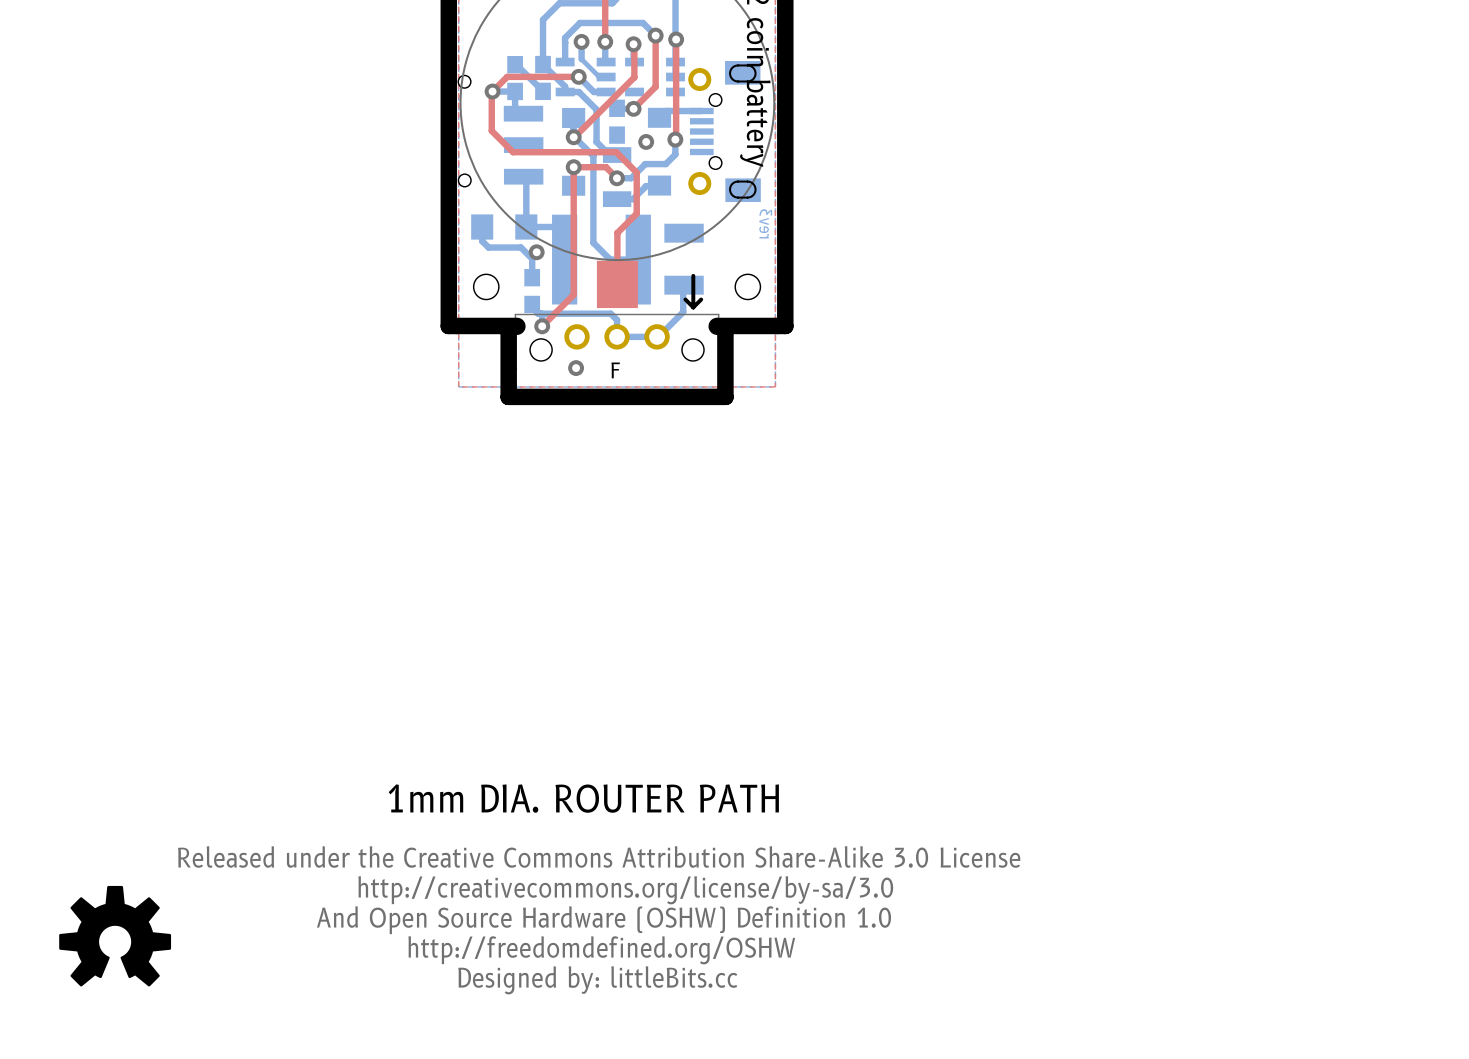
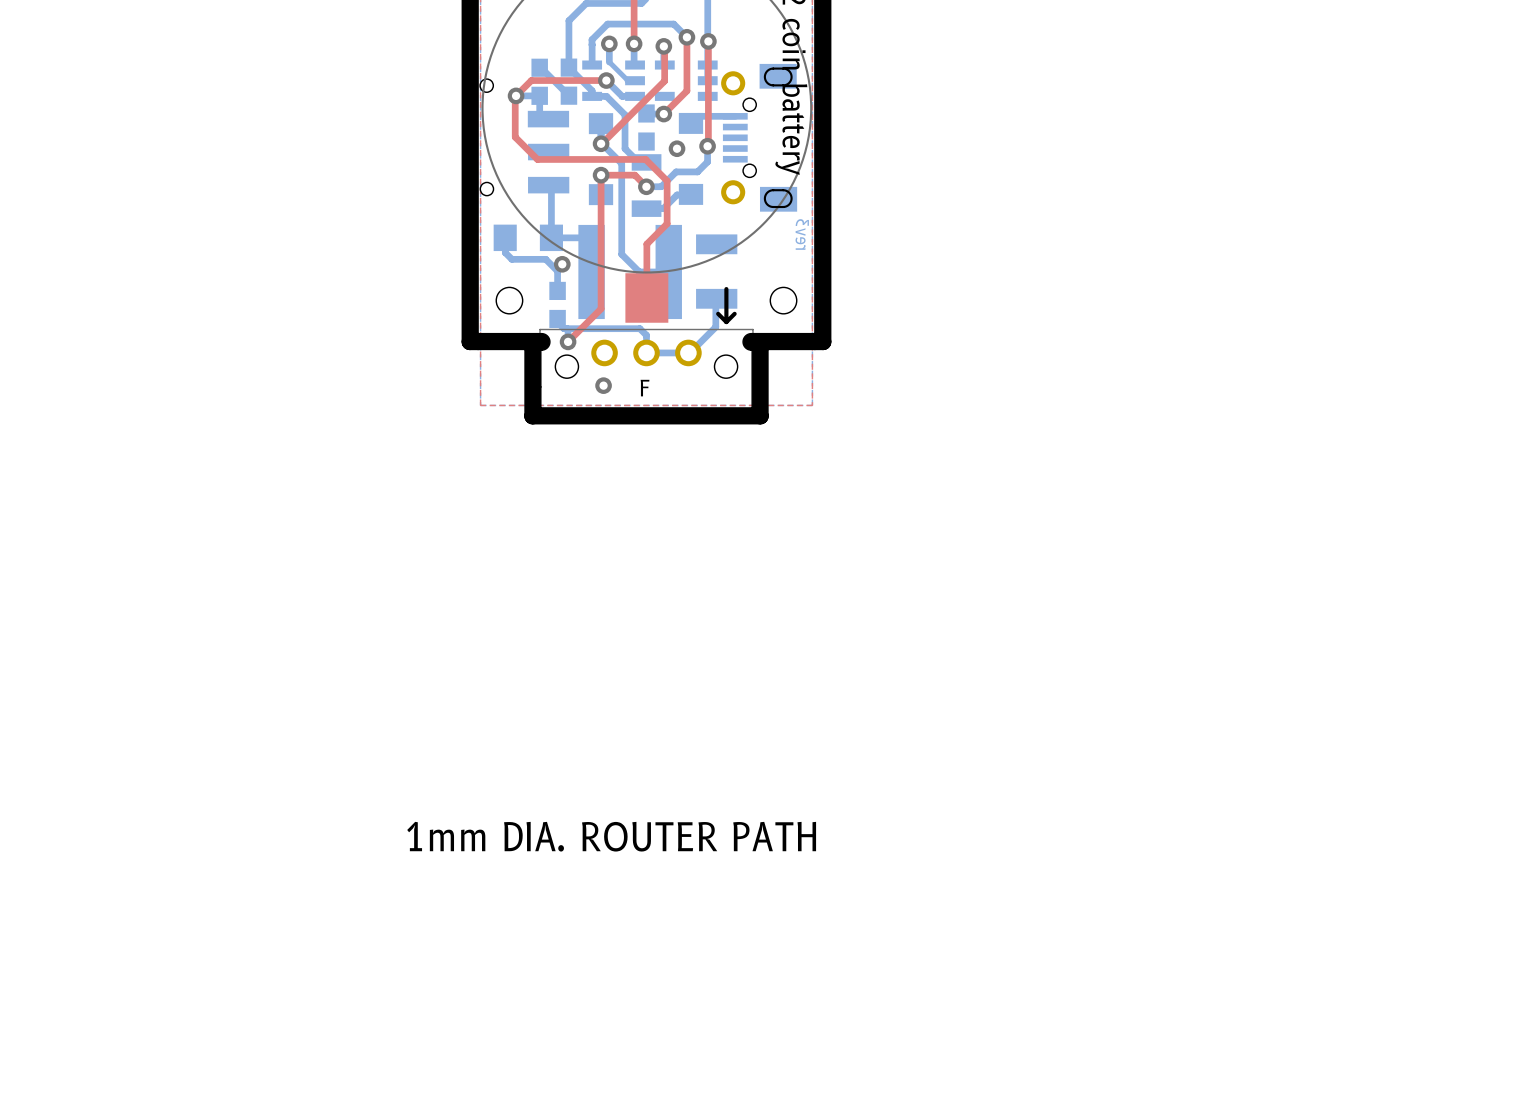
drawing: [59, 885, 172, 987] -> none

